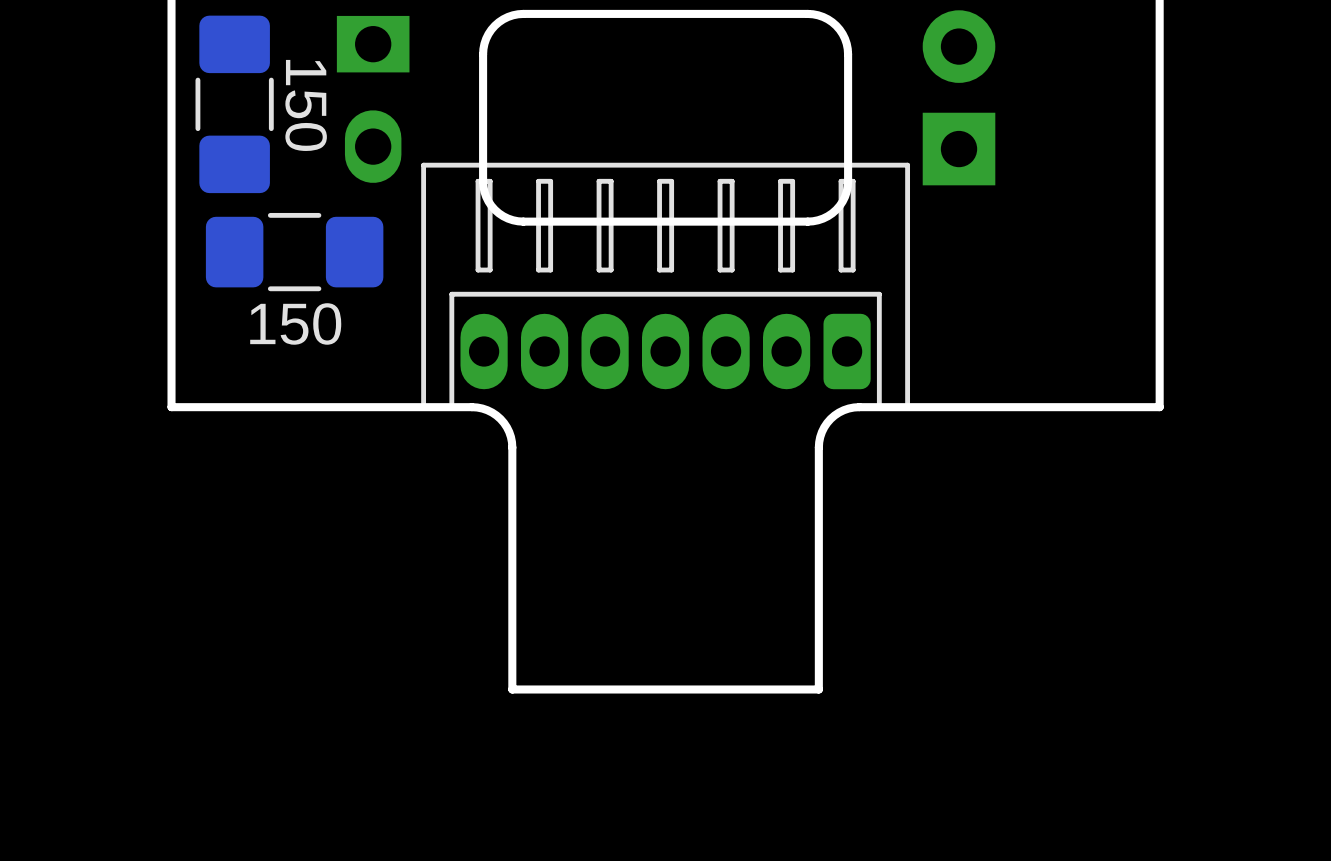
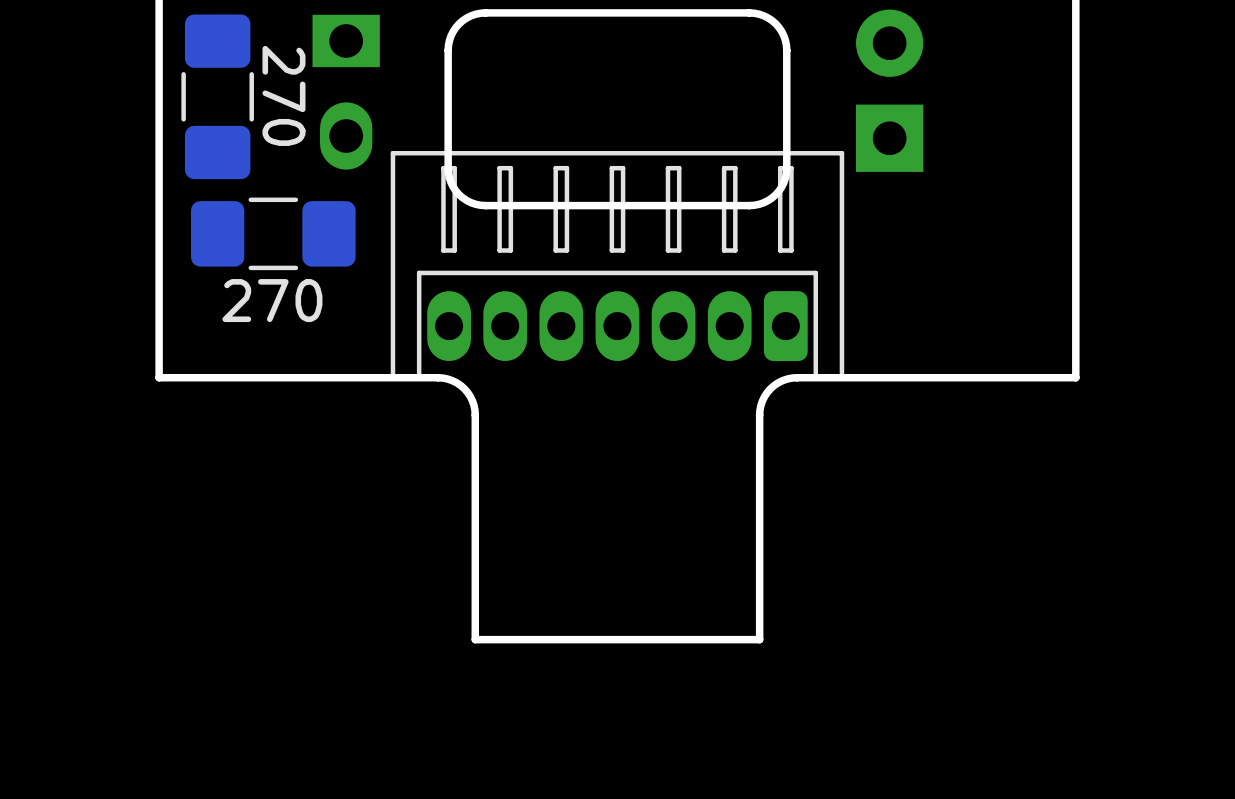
part value: 150 (306, 105) -> 270 (283, 95)
part value: 150 (295, 323) -> 270 (272, 300)

